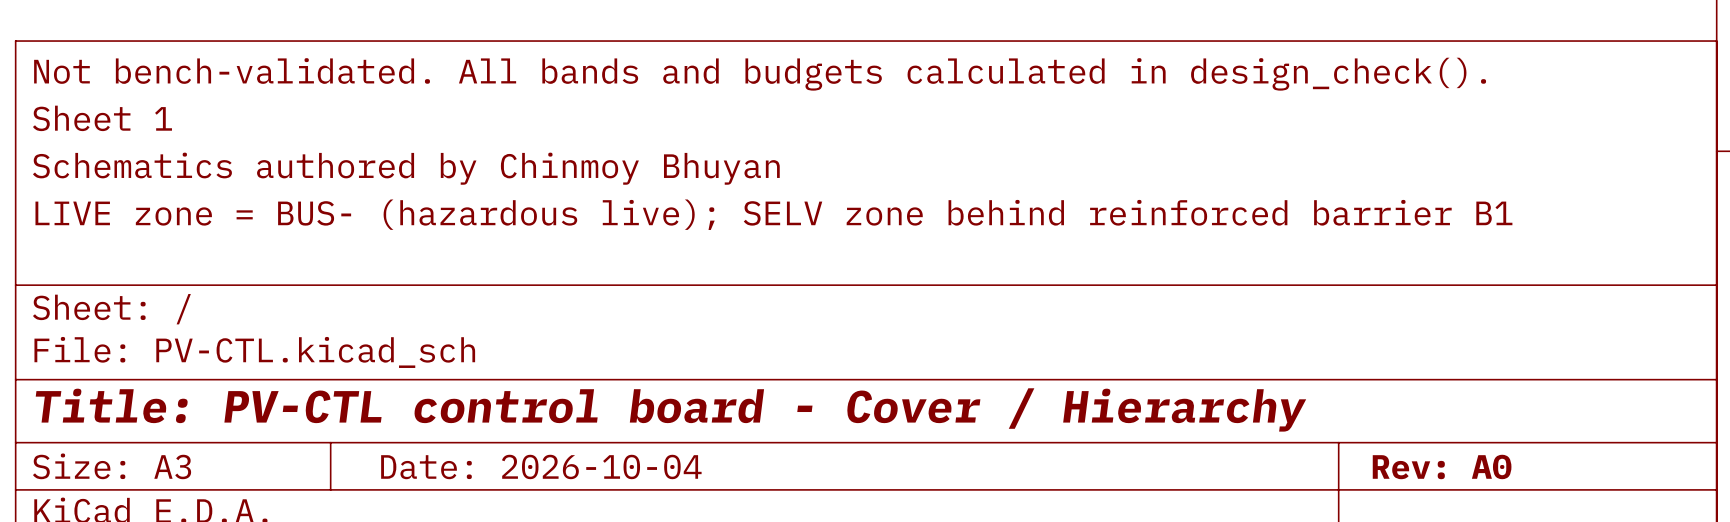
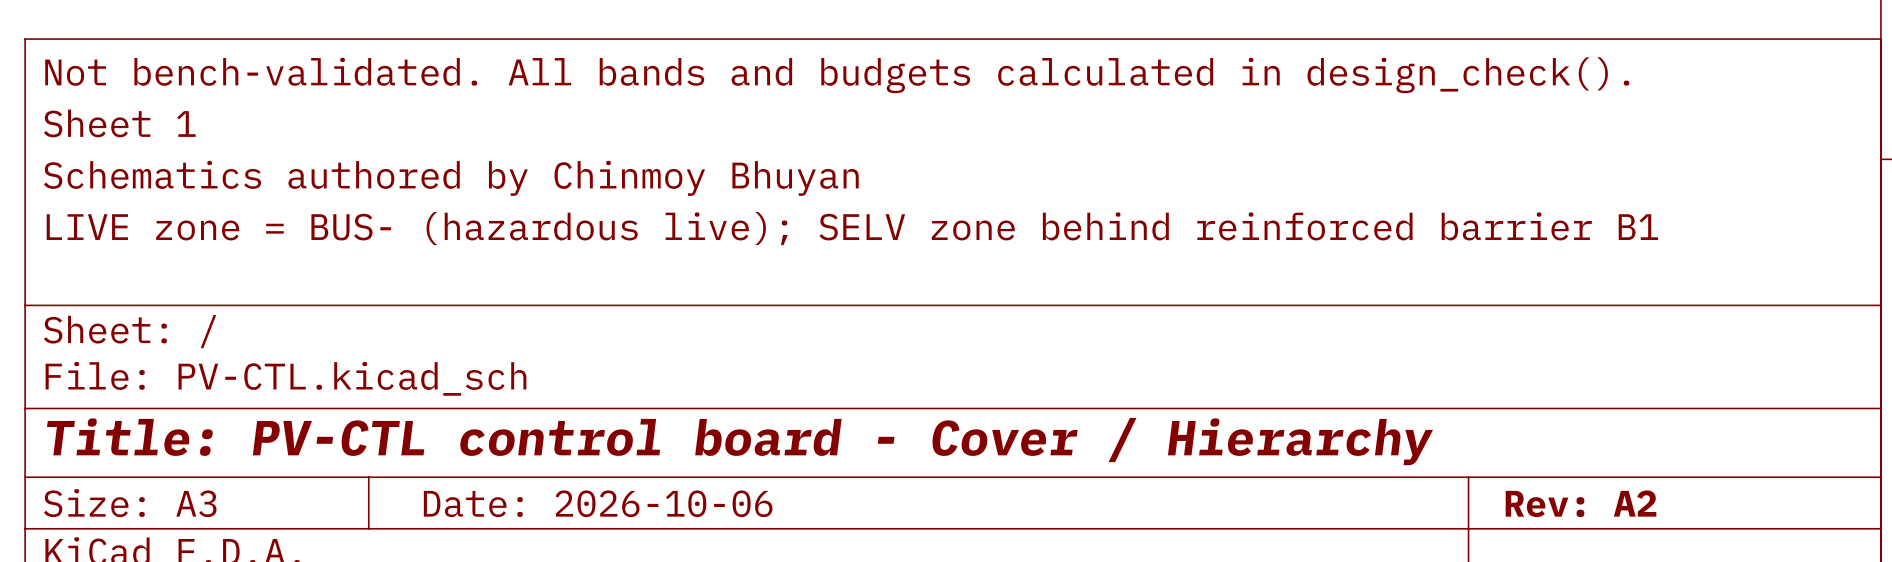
title block: Date: 2026-10-04 (541, 466) -> Date: 2026-10-06 (598, 503)
title block: Rev: A0 (1442, 466) -> Rev: A2 (1581, 503)

